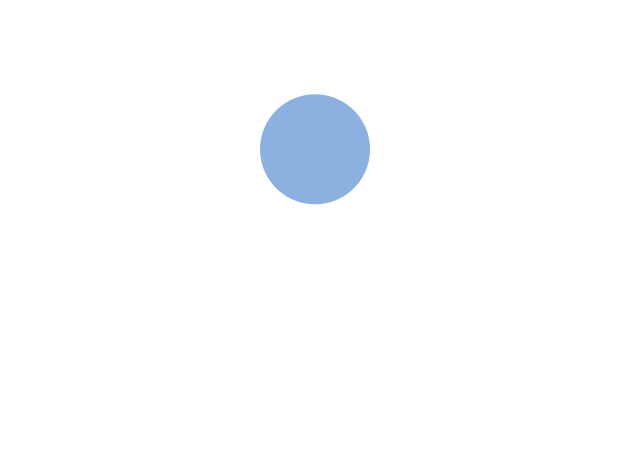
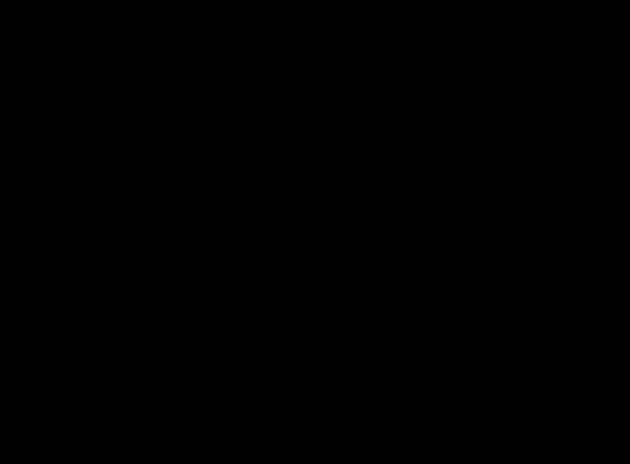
part: (315, 149) -> none

